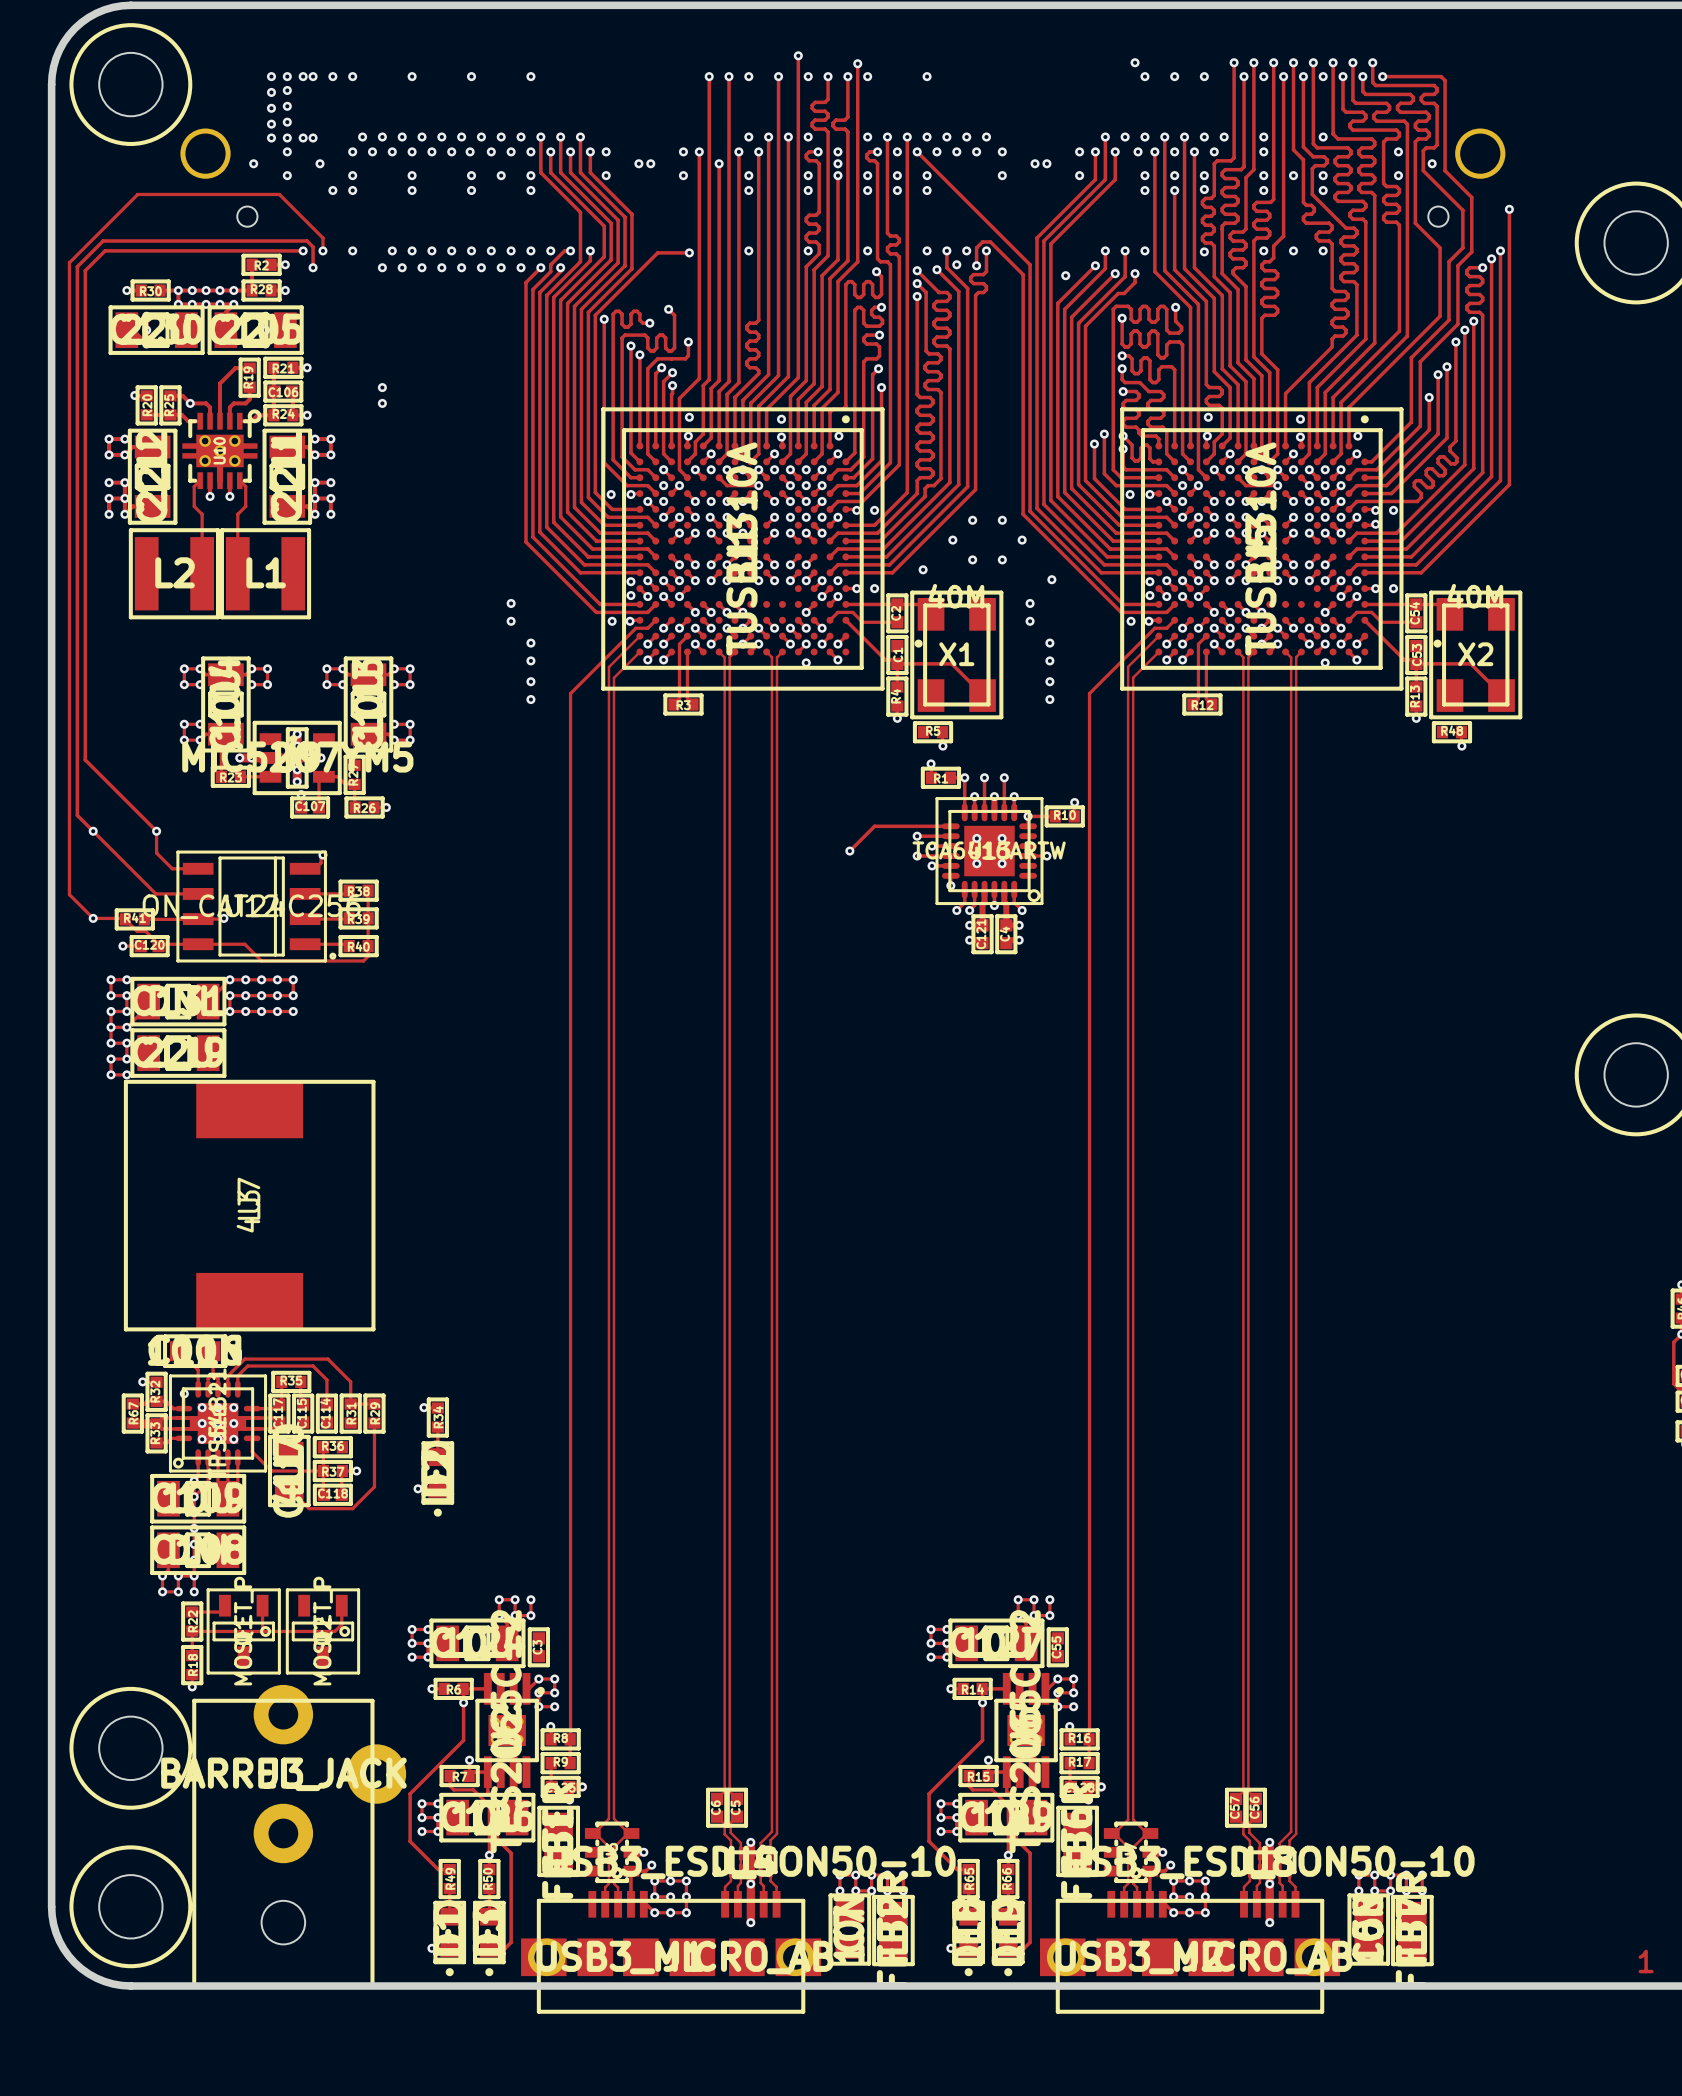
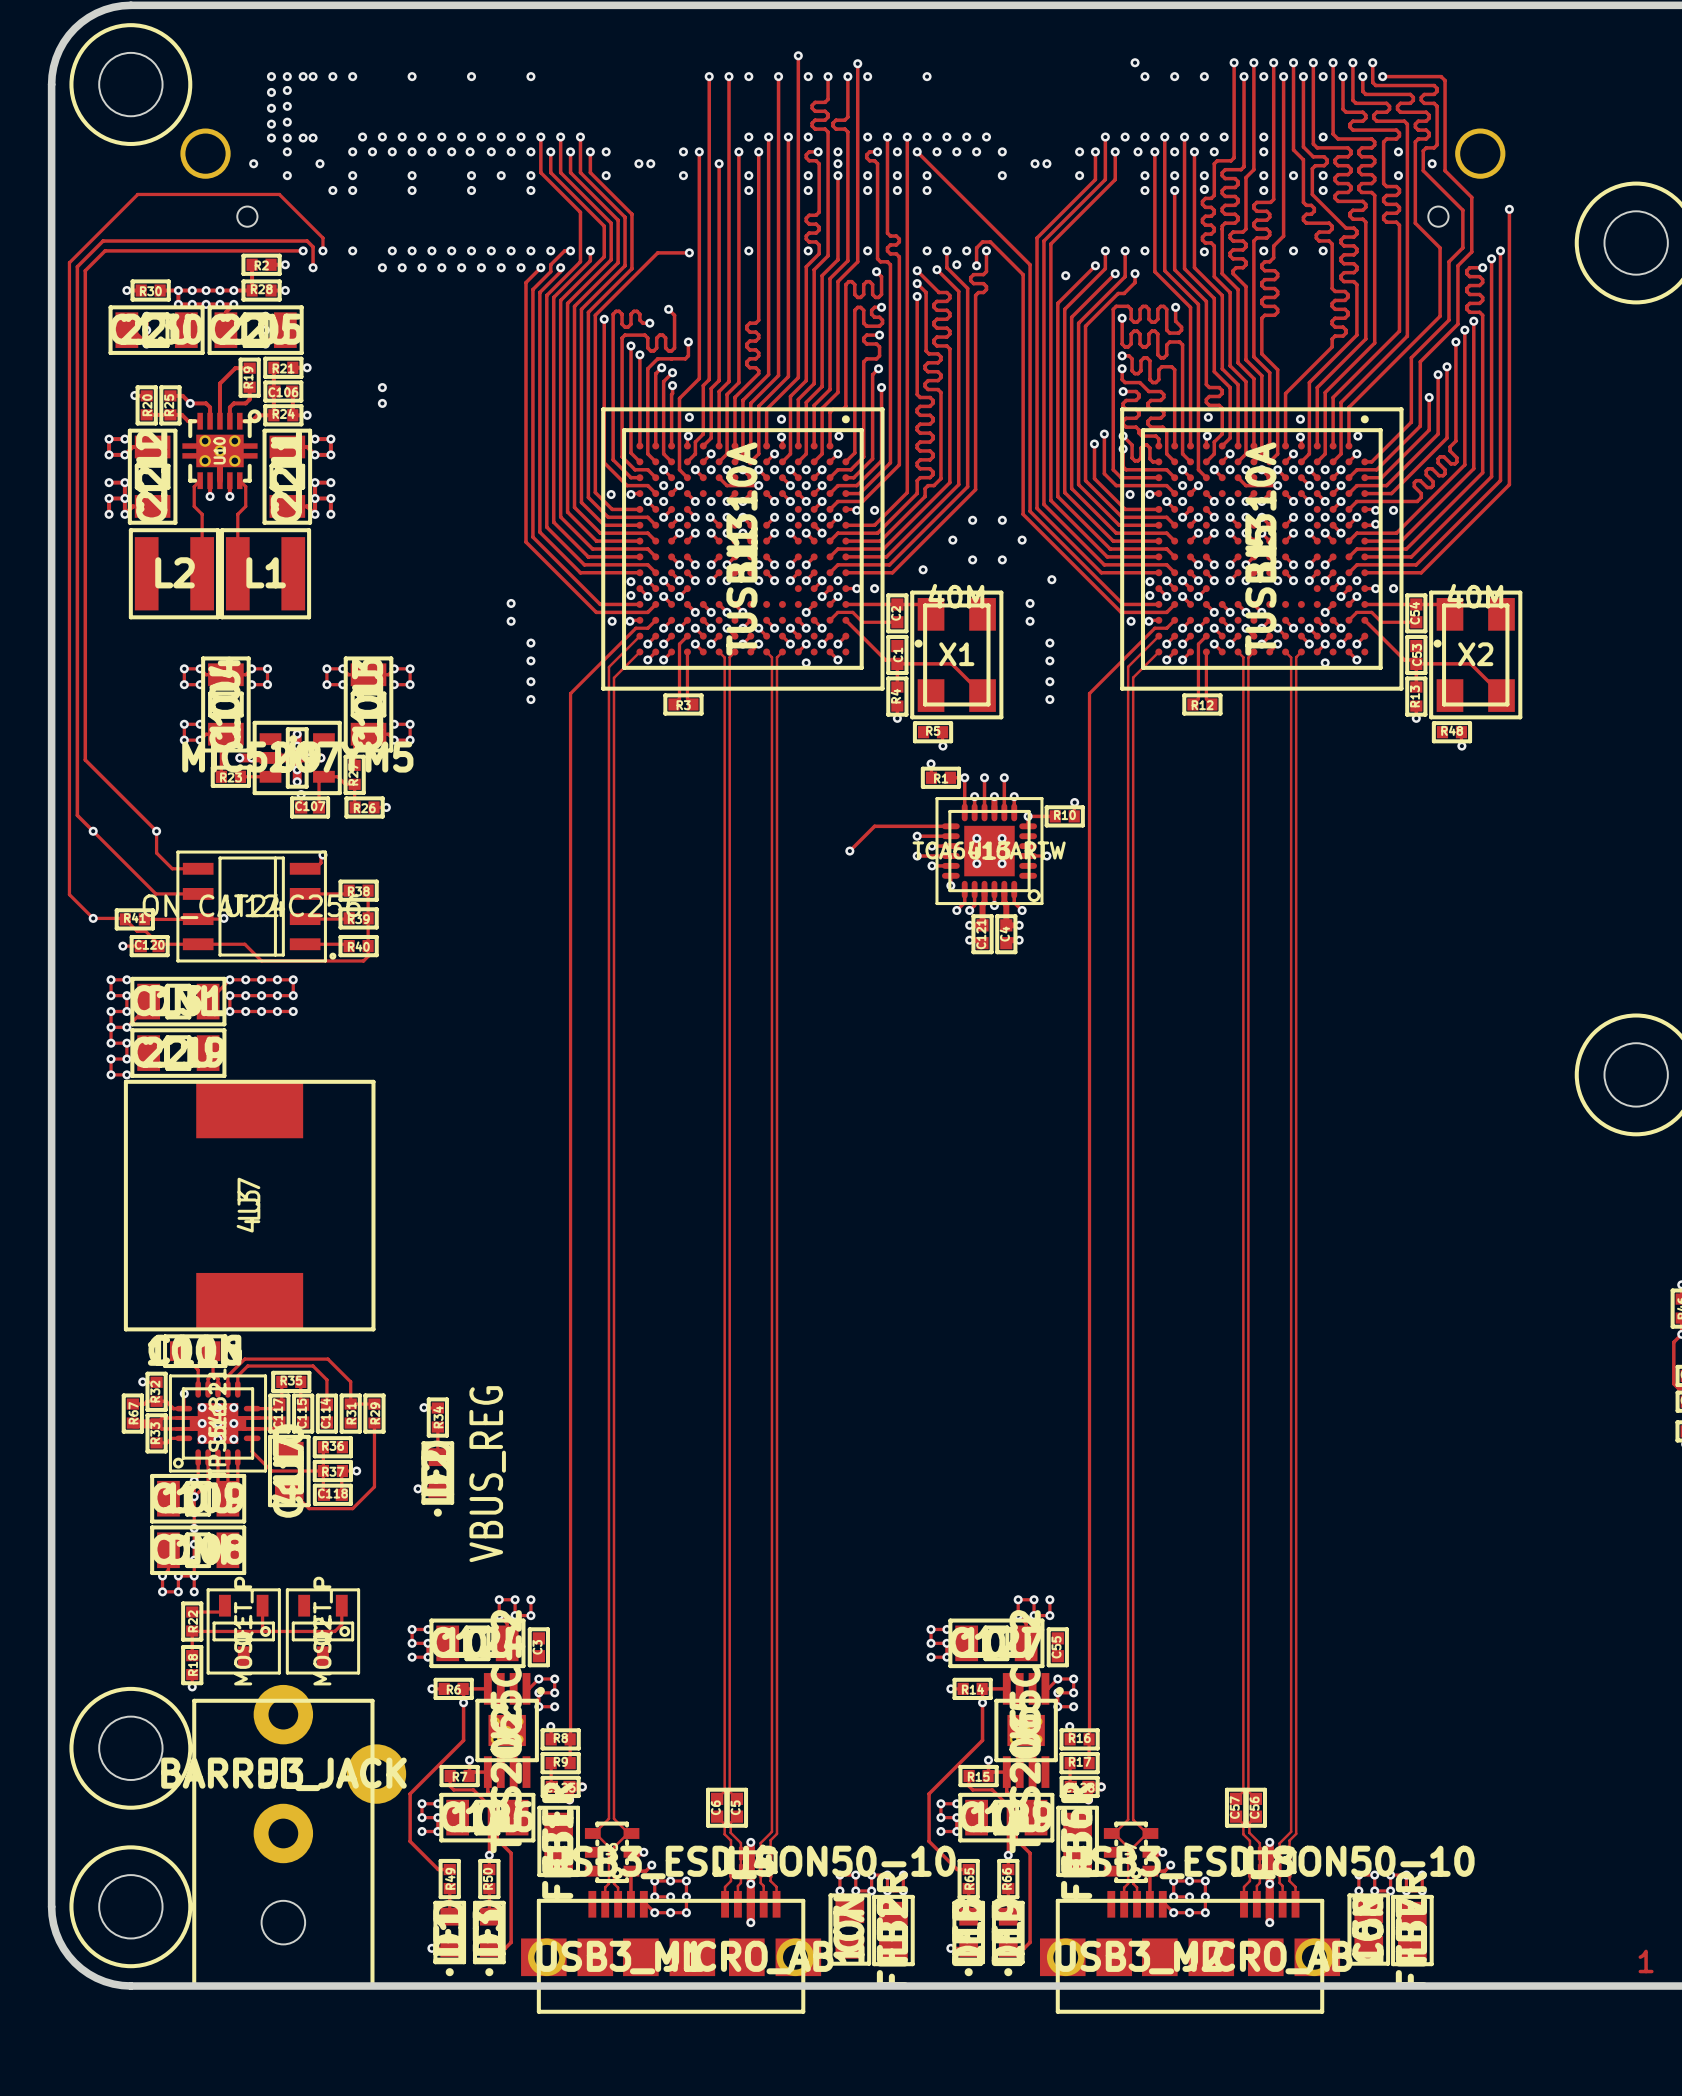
text: none -> VBUS_REG (487, 1474)

